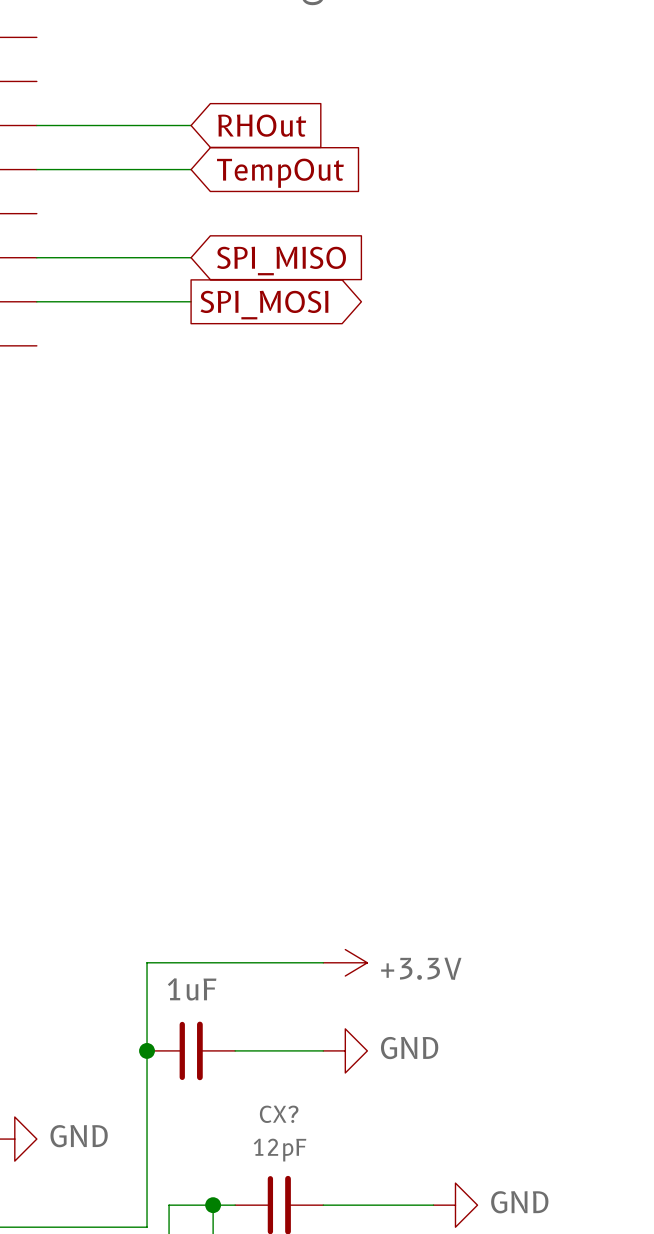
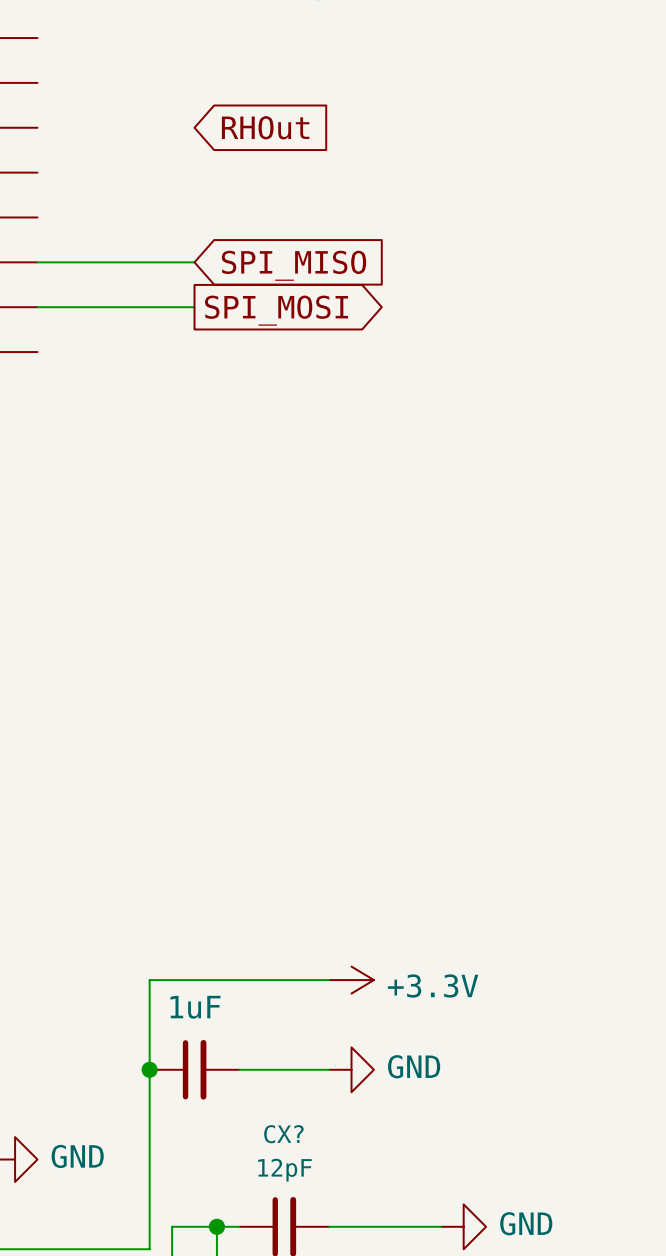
wire: (36, 125) (191, 125) -> none
wire: (36, 169) (191, 169) -> none
global label: TempOut (280, 173) -> none

